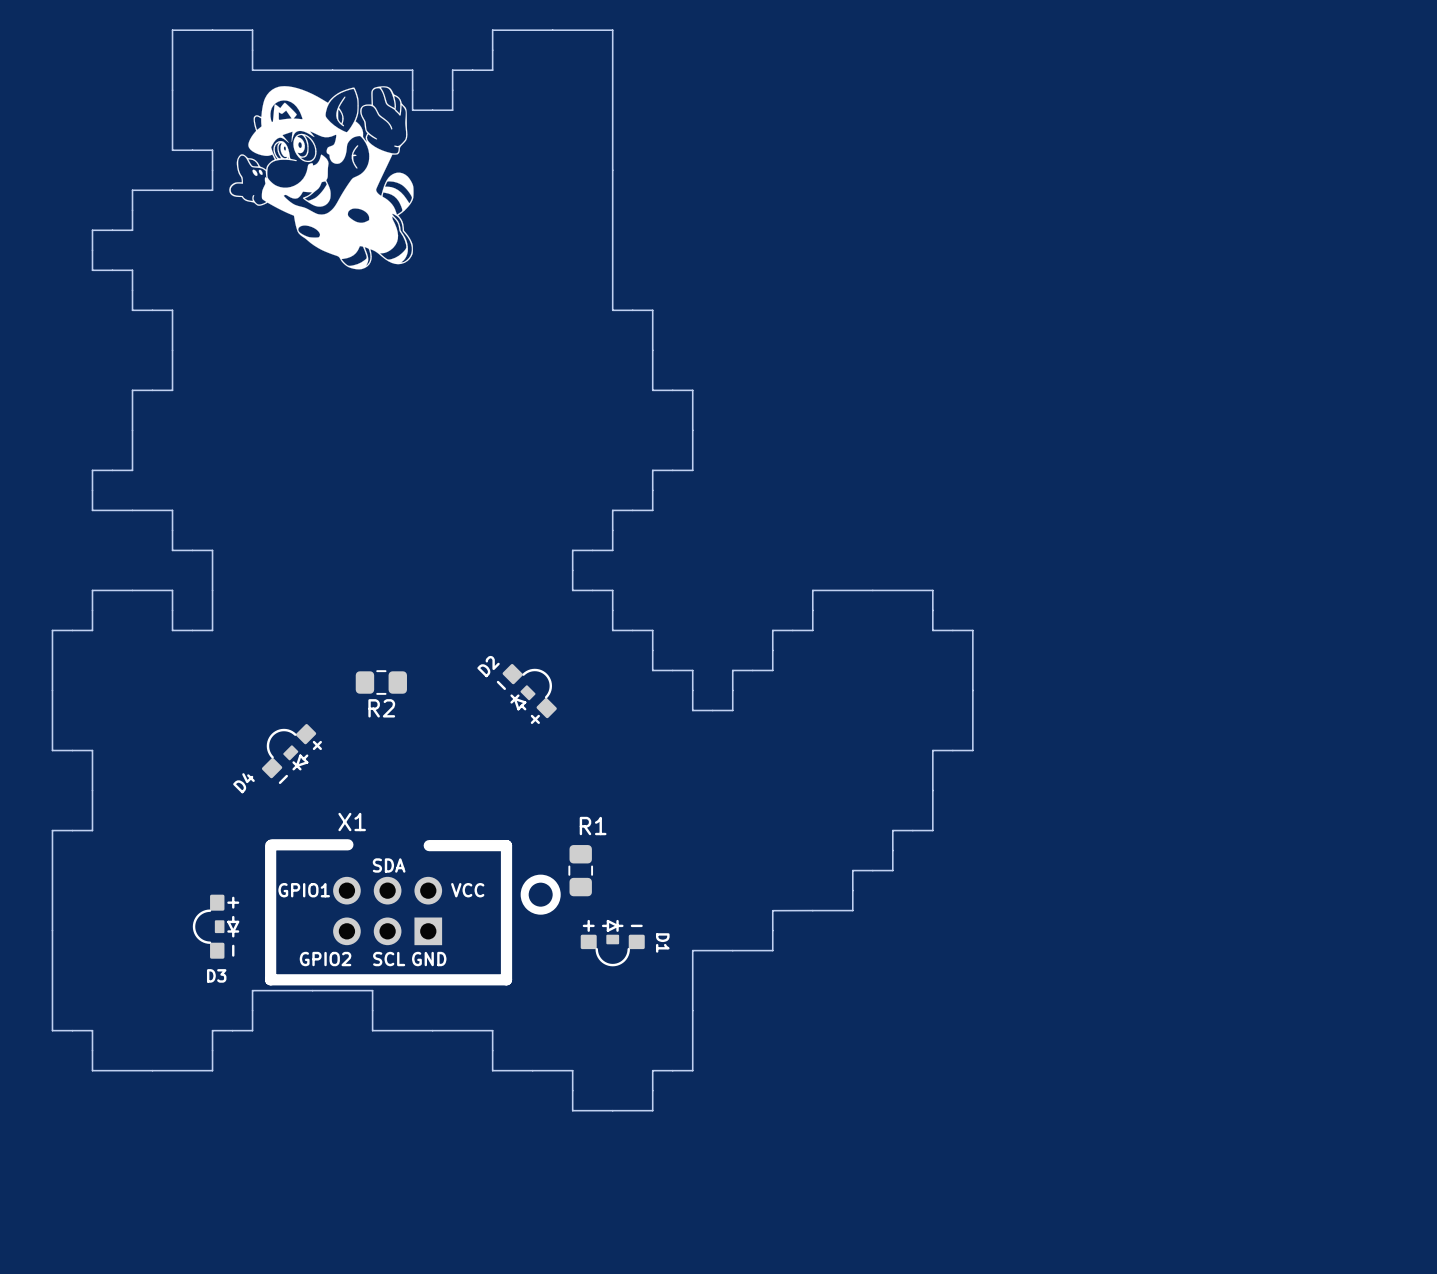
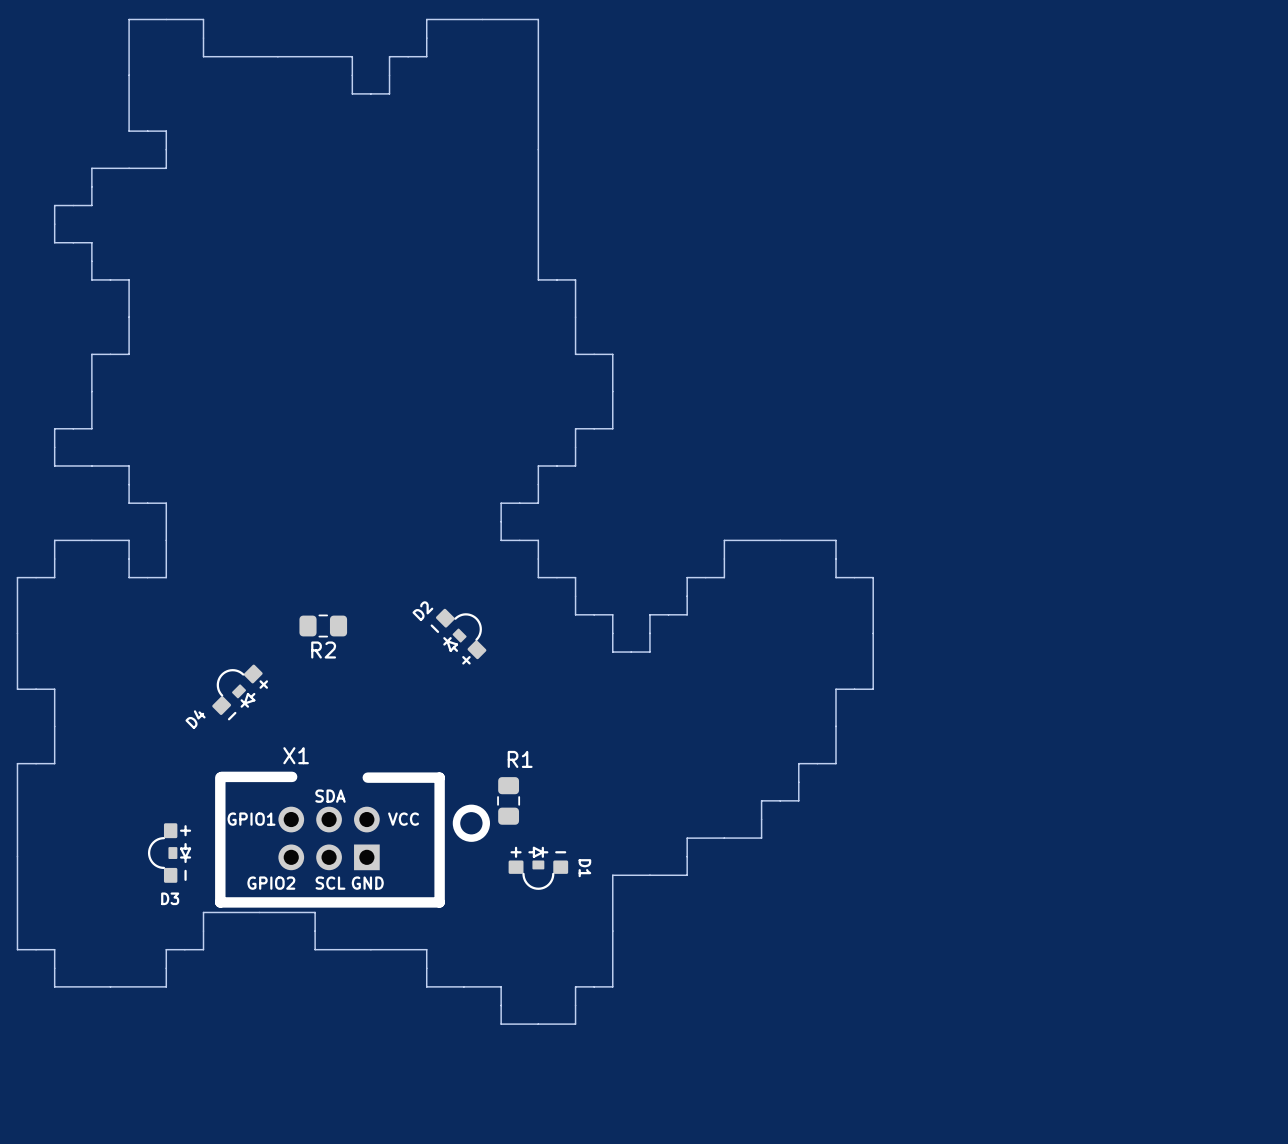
drawing: [229, 86, 414, 270] -> none

